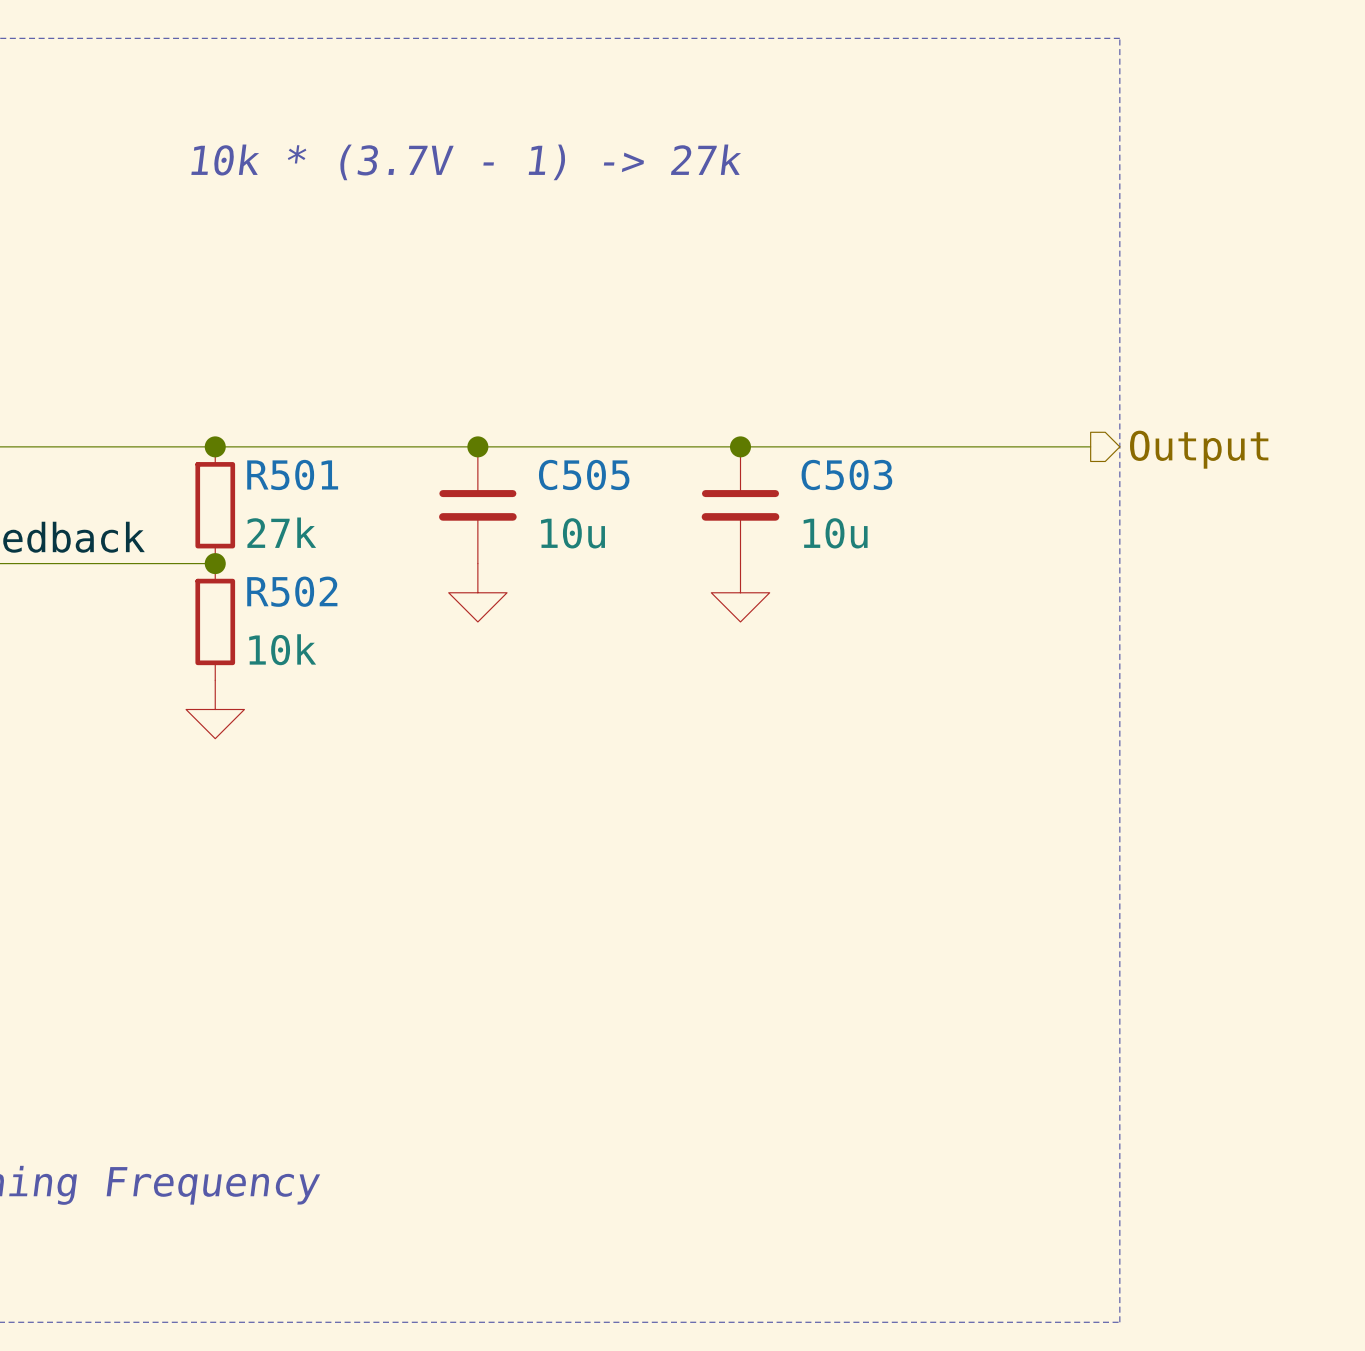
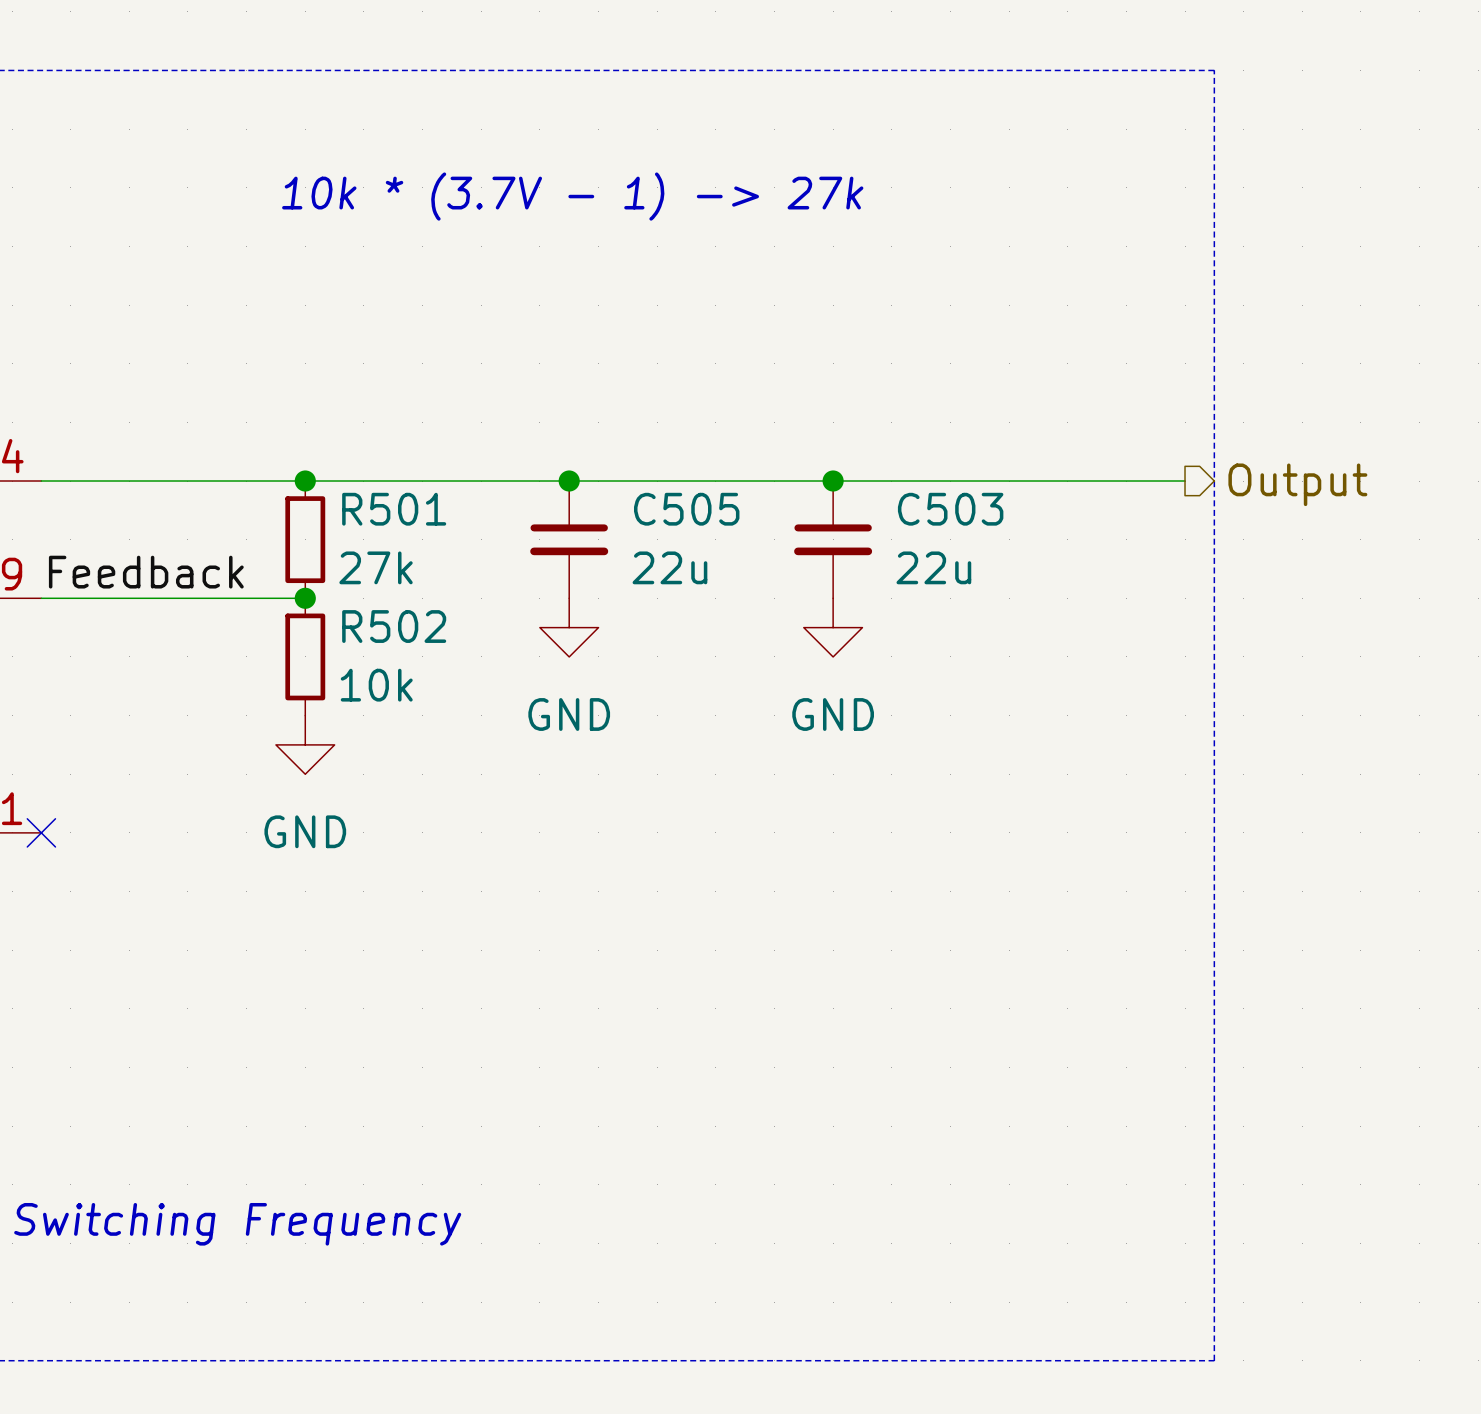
C505 value: 10u (573, 533) -> 22u (669, 567)
C503 value: 10u (835, 533) -> 22u (933, 567)
power symbol text: none -> GND (569, 714)
power symbol text: none -> GND (833, 714)
power symbol text: none -> GND (305, 831)

